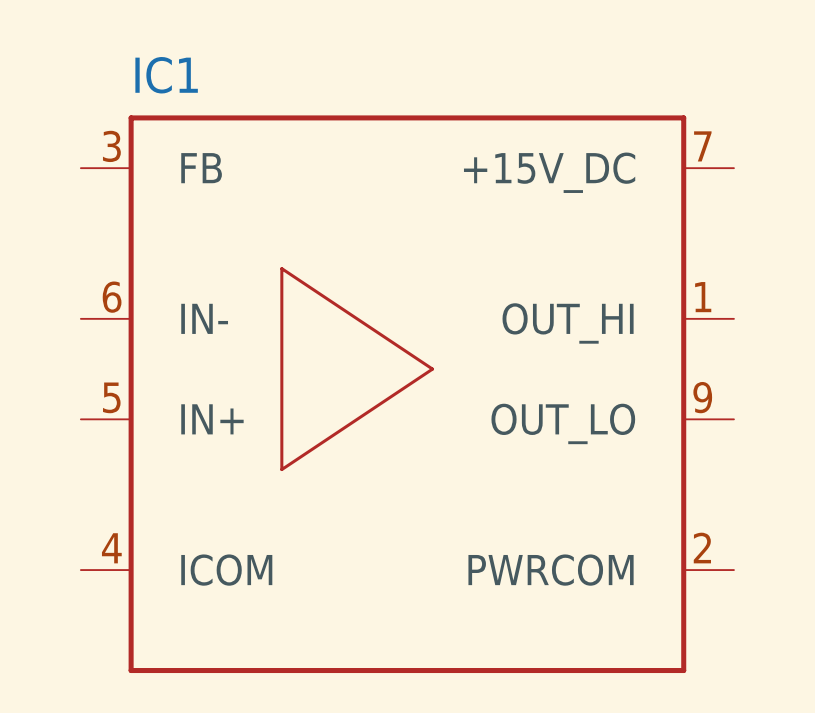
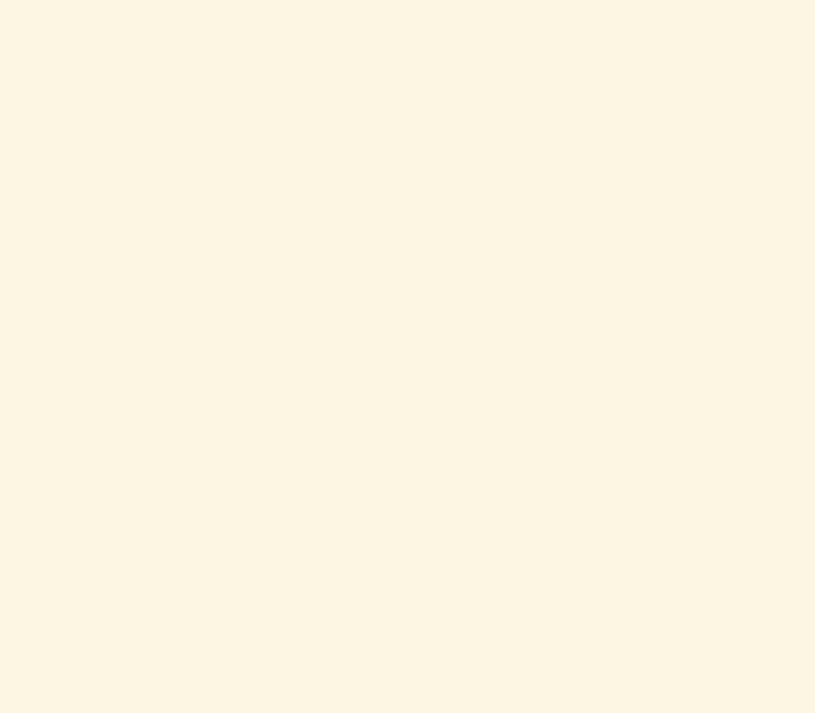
IC1: (407, 394) -> none

